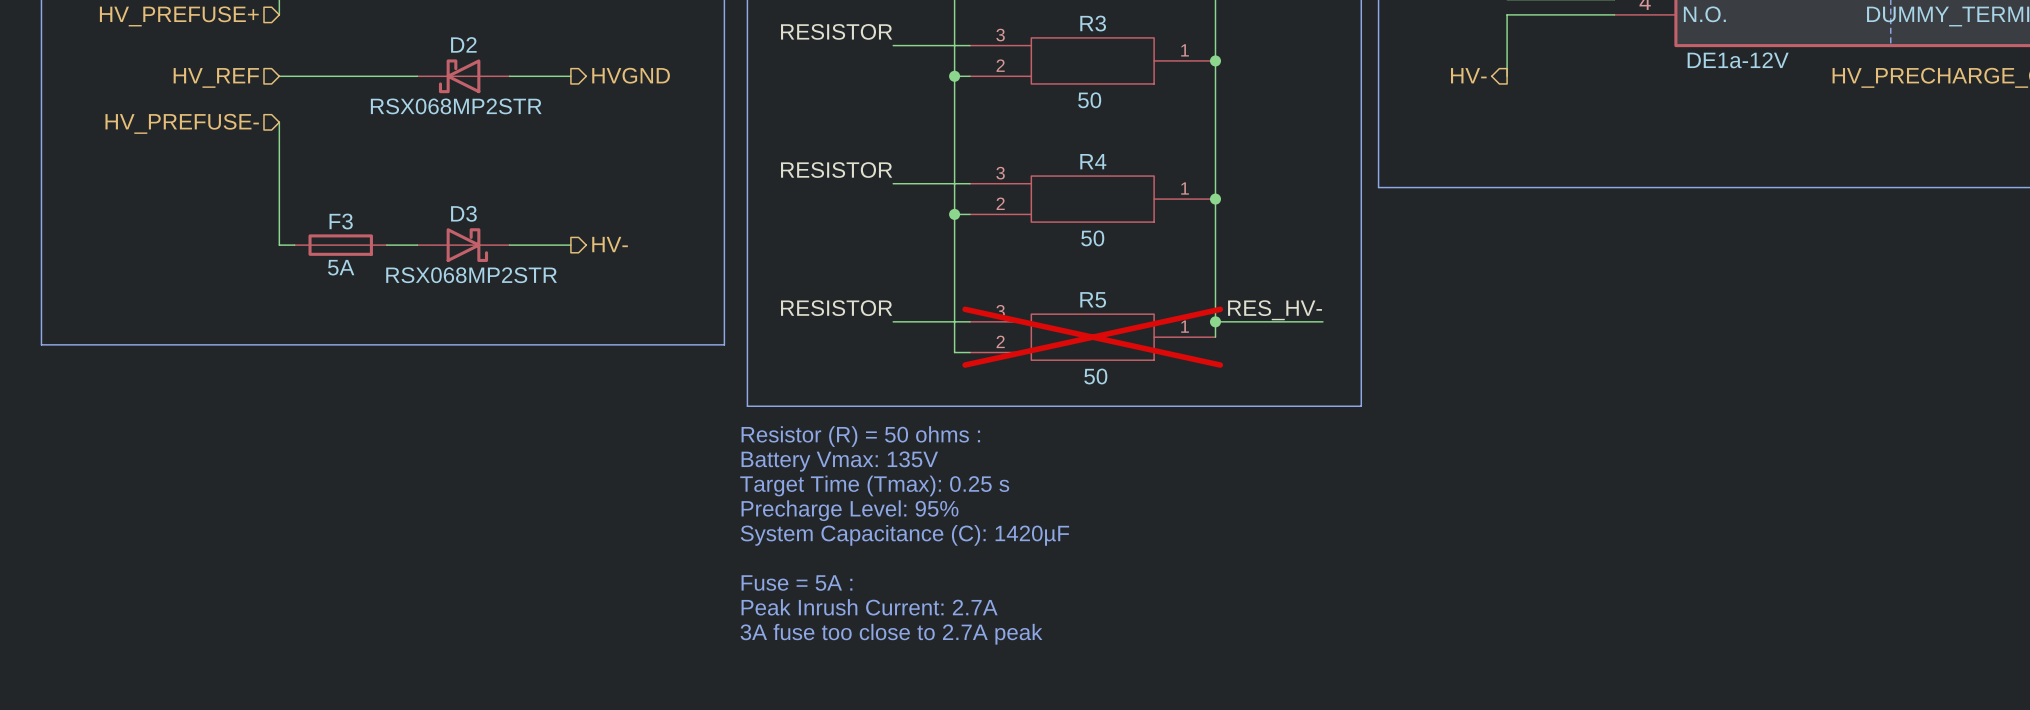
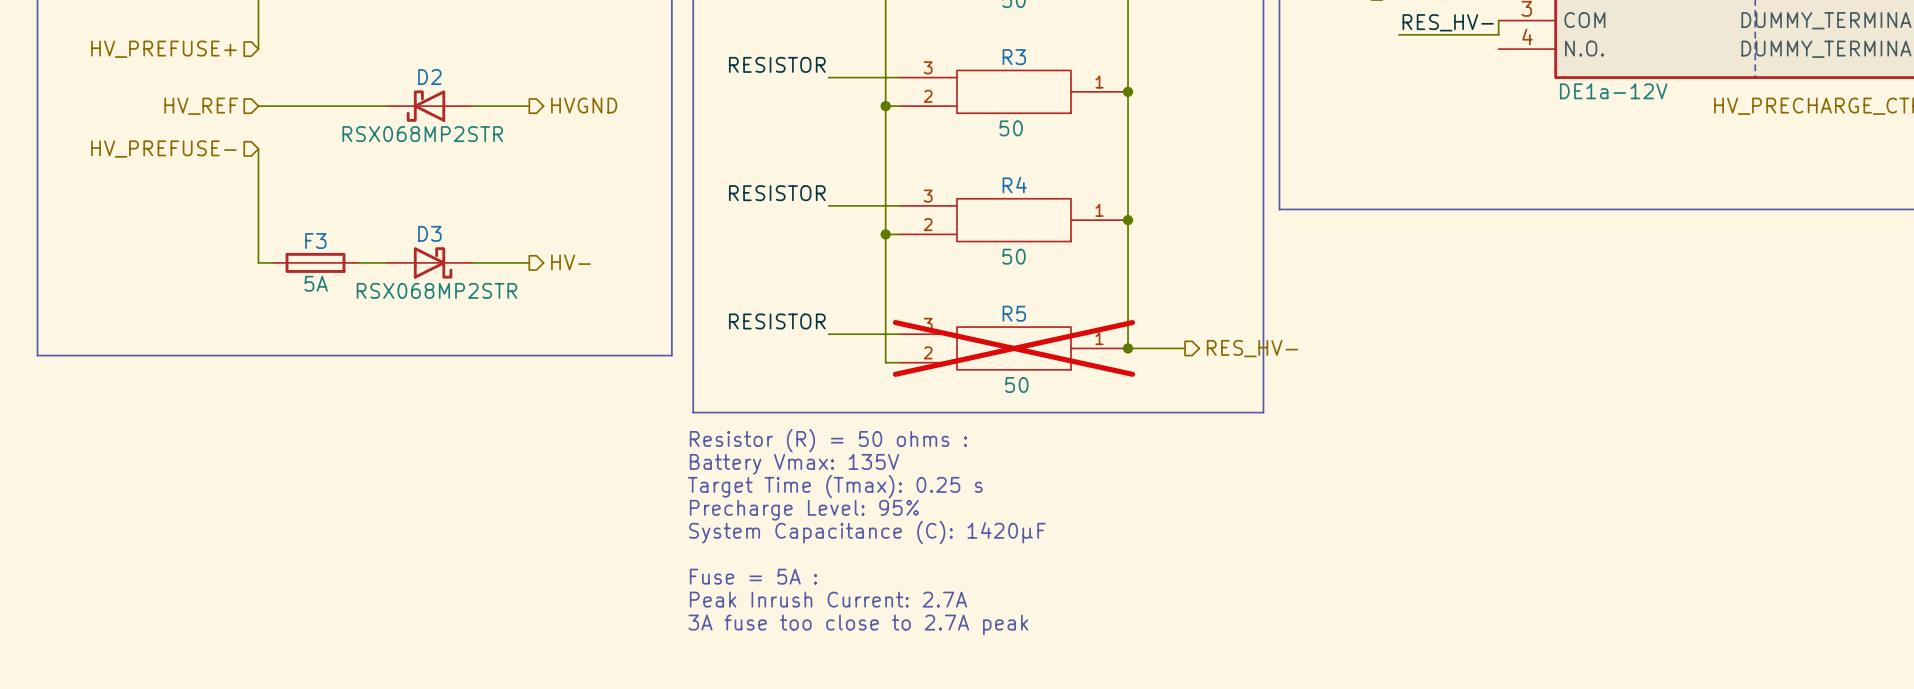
wire: (1614, 14) (1507, 14) (1507, 76) -> none
hierarchical label: HV- (1468, 75) -> none
label: RES_HV- (1274, 310) -> none
wire: (1215, 321) (1322, 321) -> none
junction position: (1215, 321) -> (1128, 348)
wire: none -> (1128, 348) (1185, 348)
hierarchical label: none -> RES_HV- (1252, 348)

